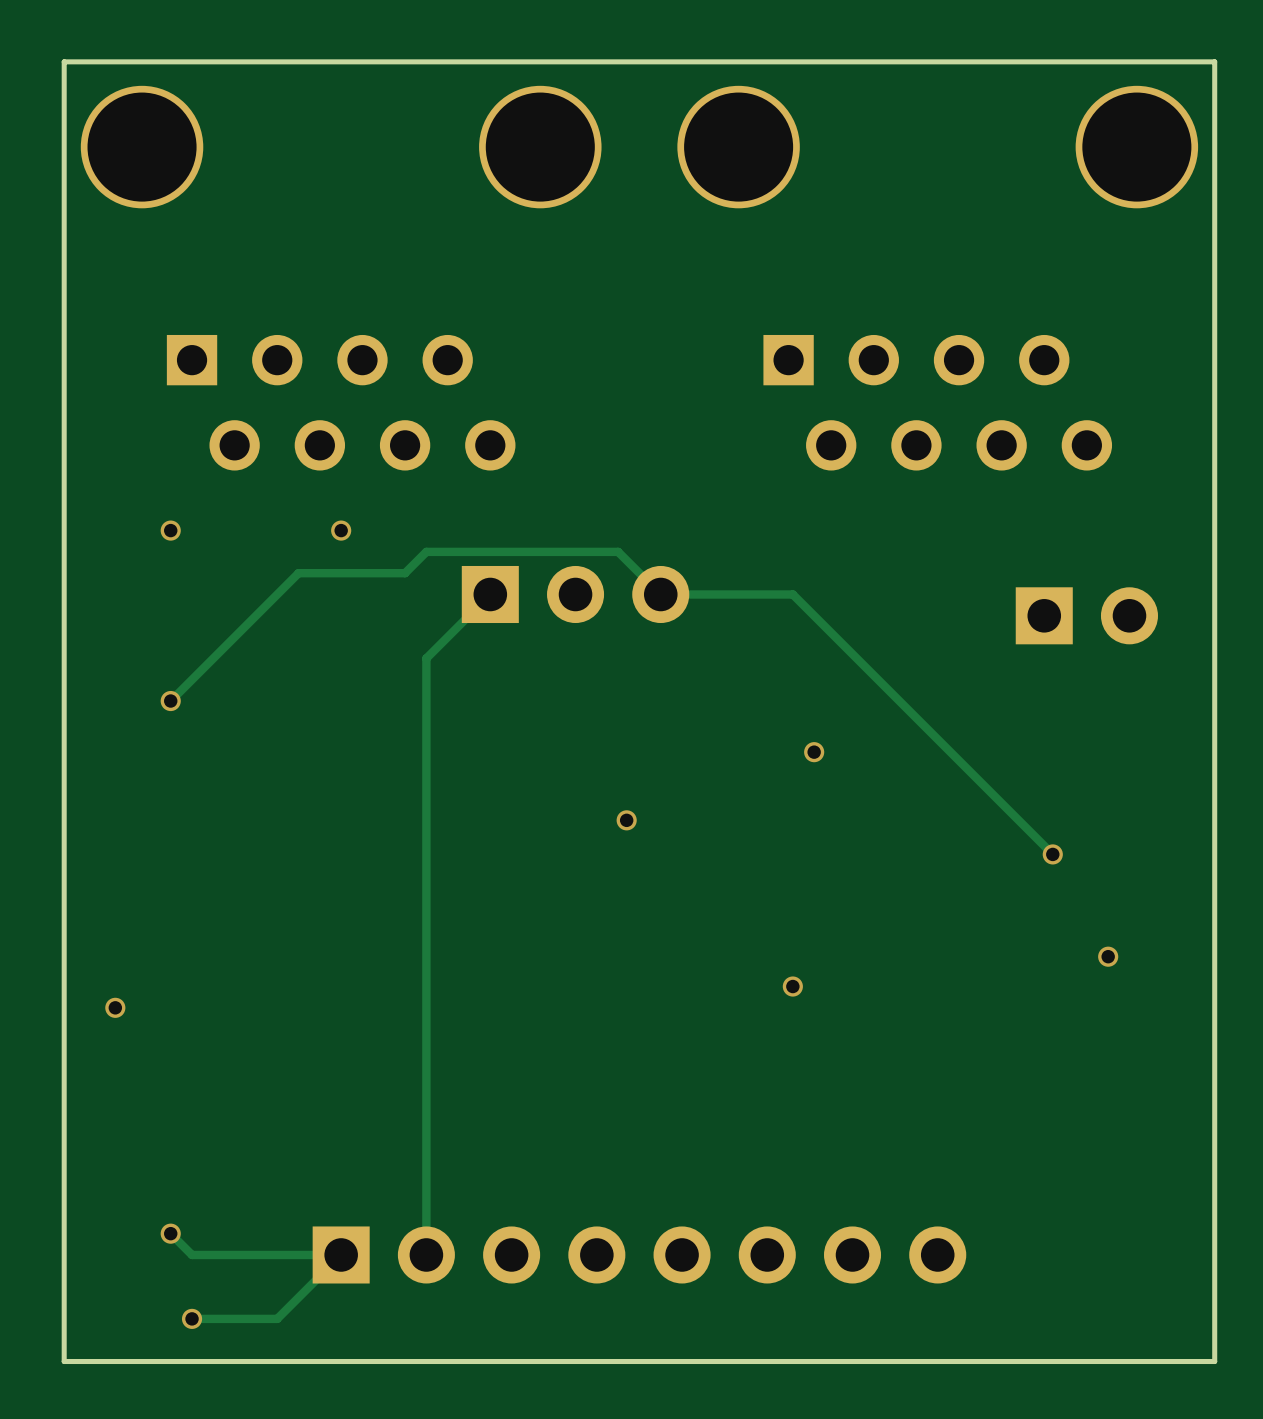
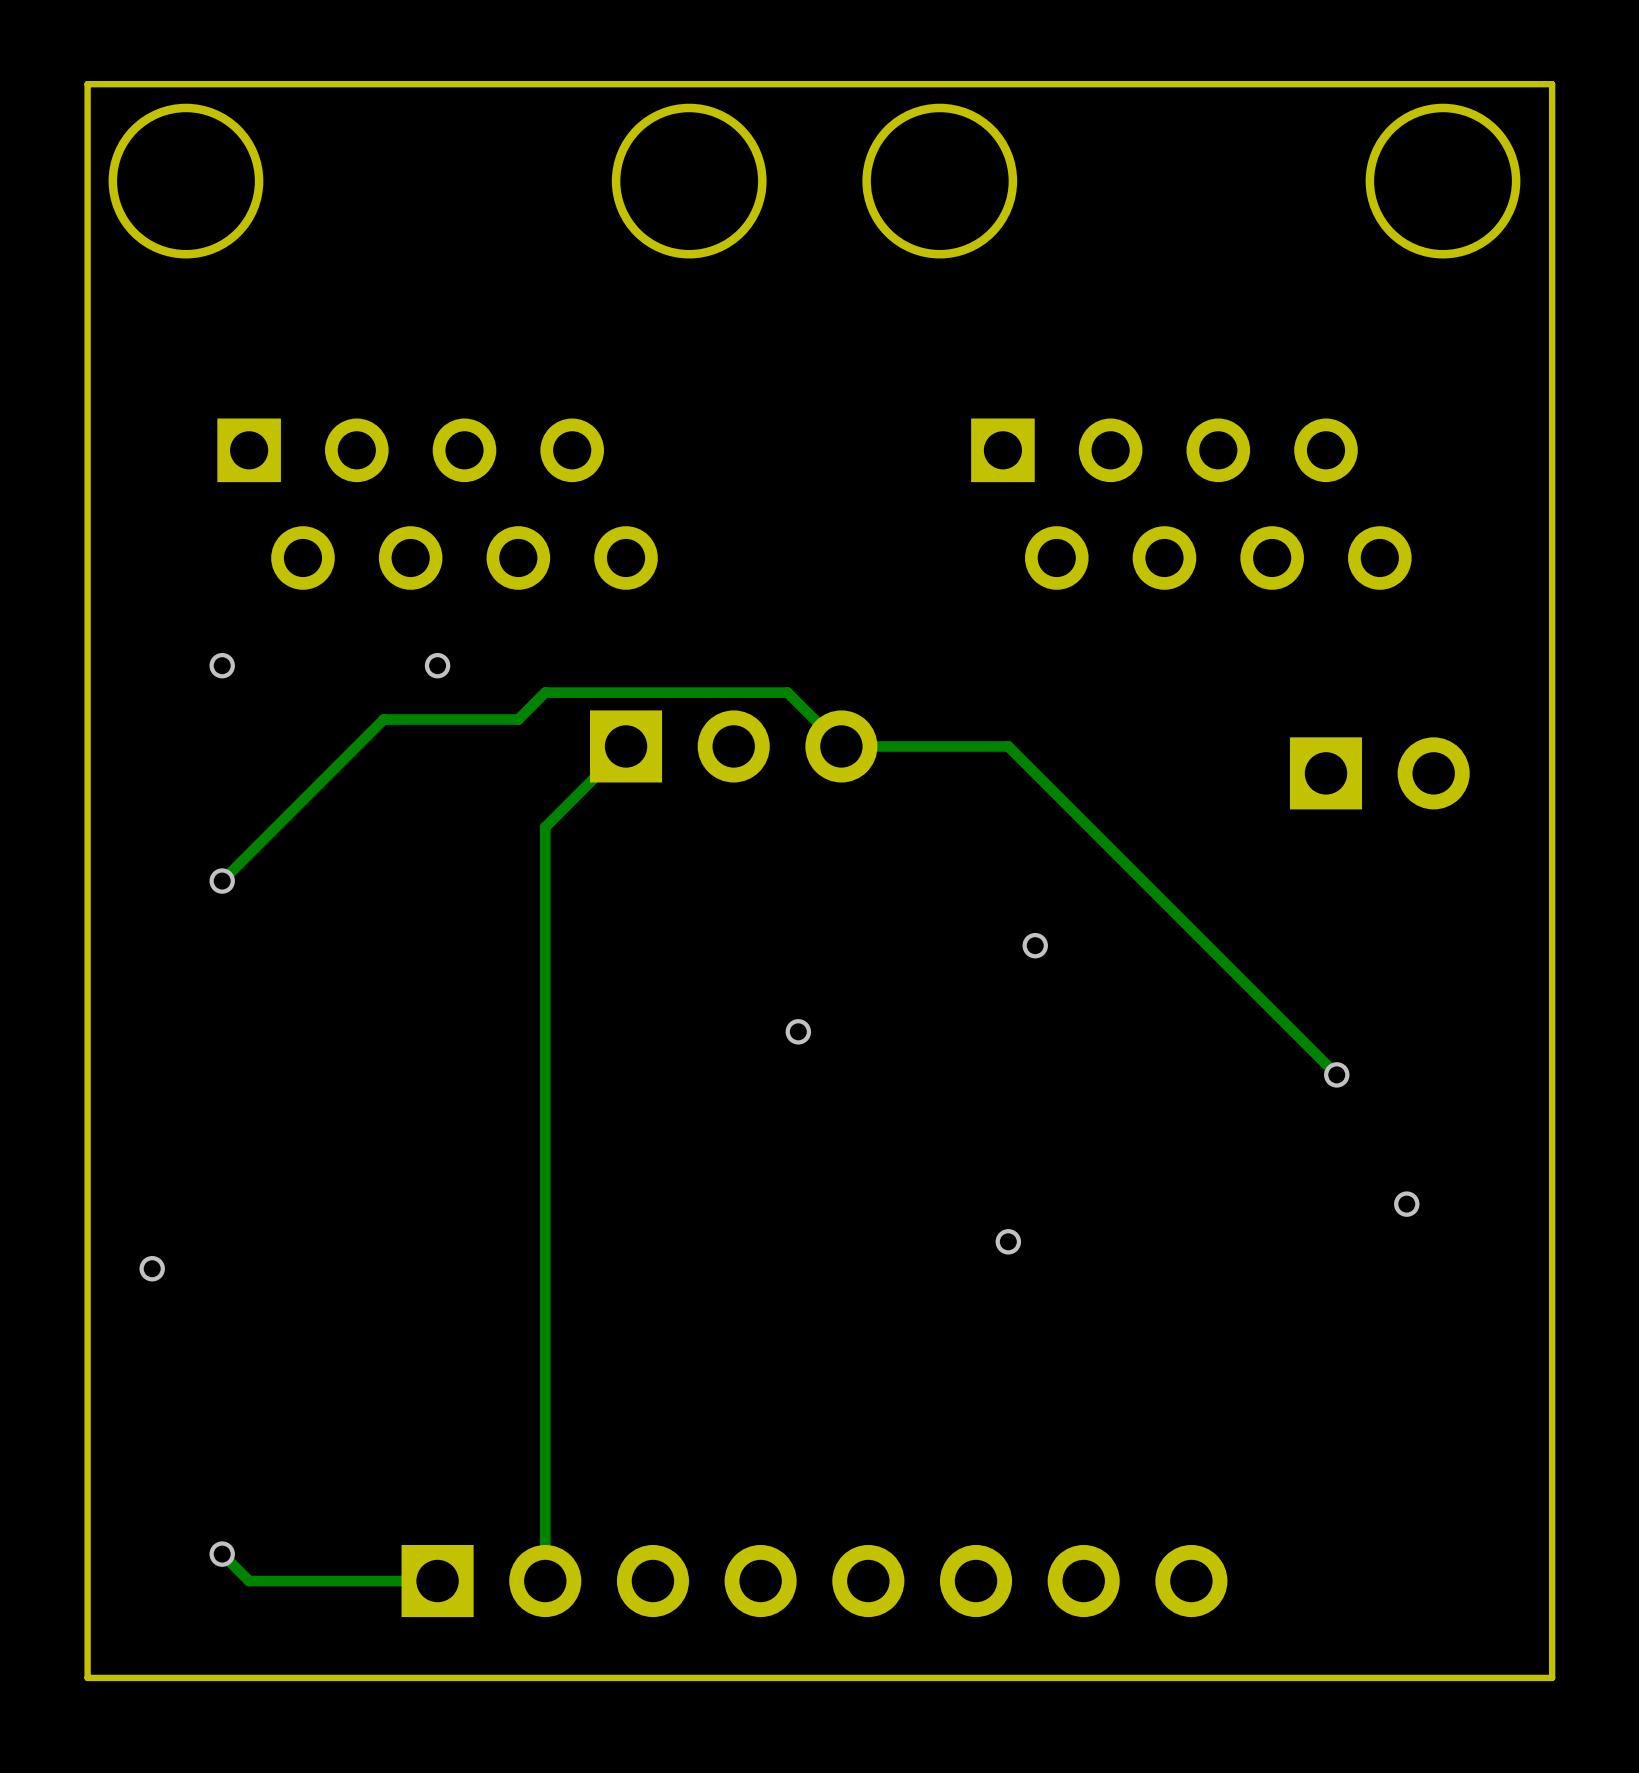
board edge: (64, 70) (64, 61) (1214, 61) (1214, 1361) (64, 1361) (64, 1331) -> (87, 84) (1552, 84) (1552, 1677) (87, 1677)
track: (341, 1254) (277, 1318) (192, 1318) -> none
via: (192, 1318) -> none

